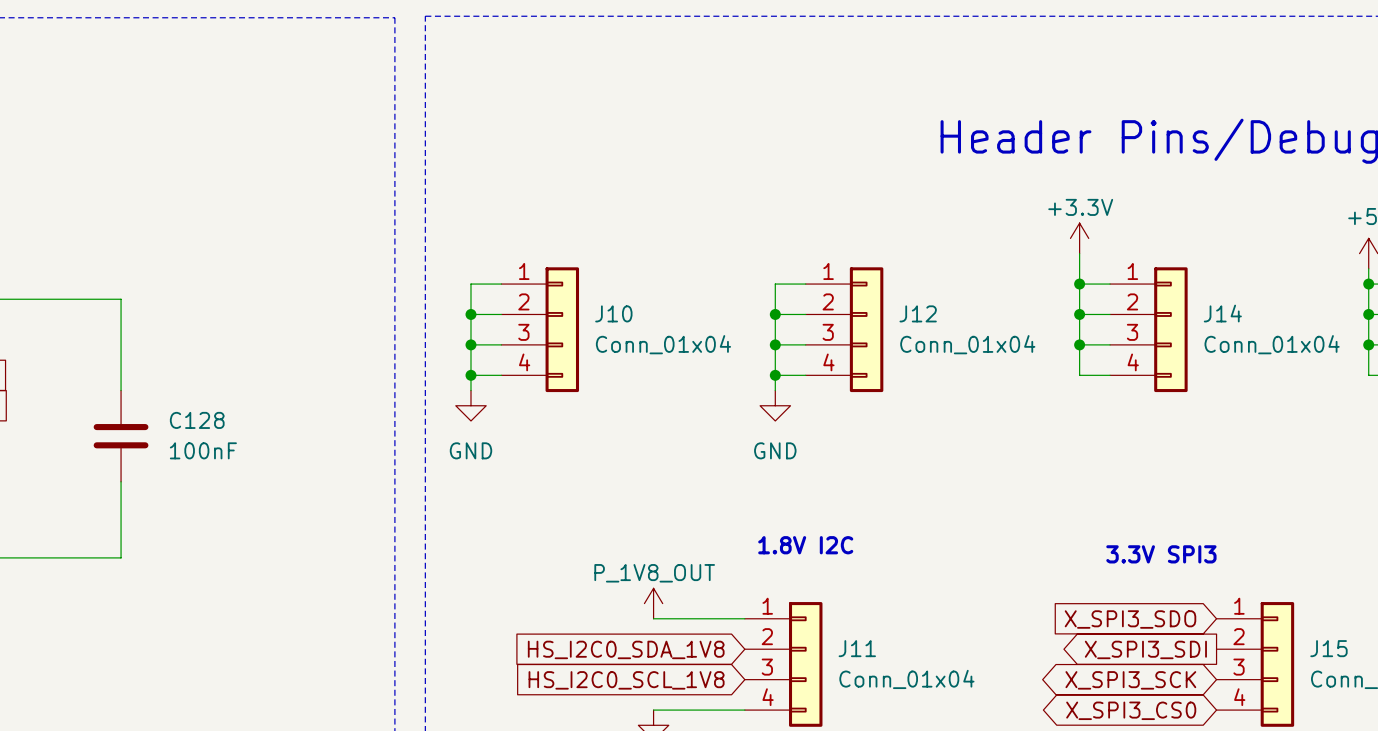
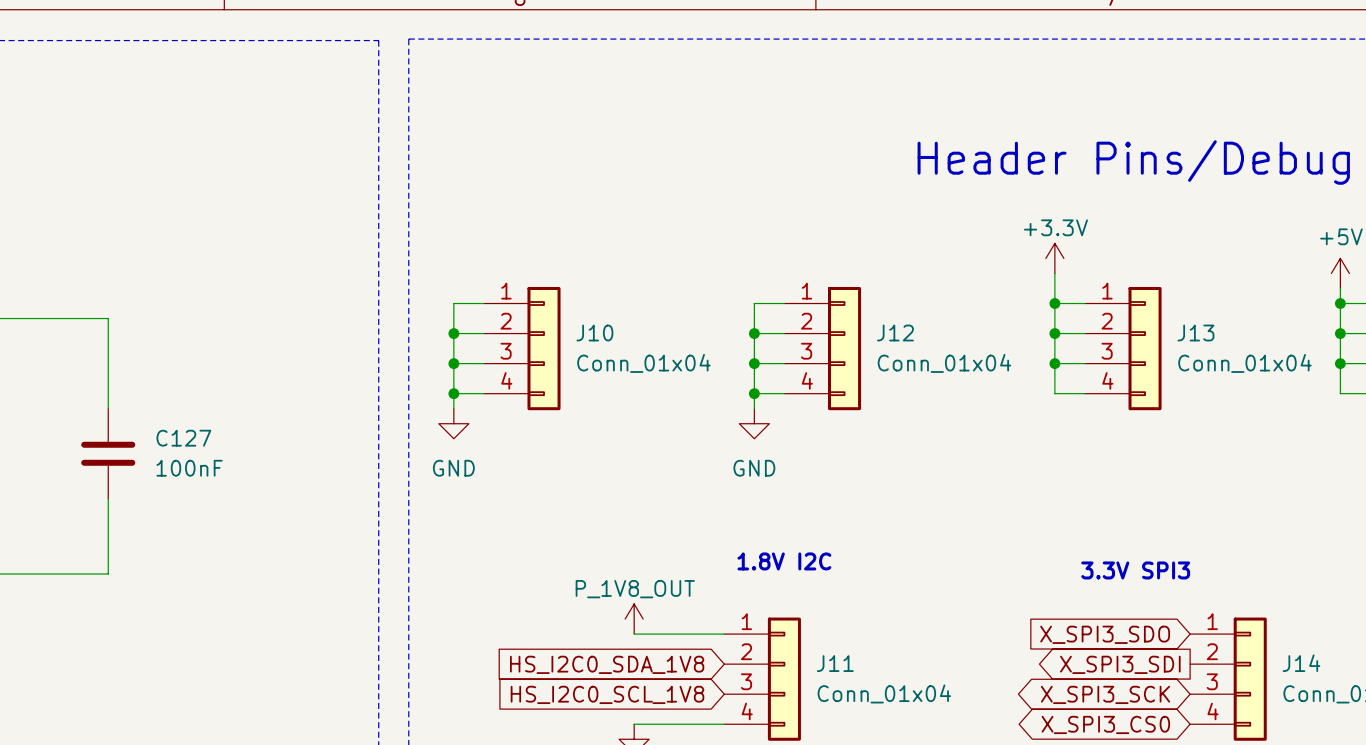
J14 name: J14 (1222, 313) -> J13 (1195, 333)
C128 name: C128 (197, 420) -> C127 (183, 438)
J15 name: J15 (1328, 648) -> J14 (1301, 663)

